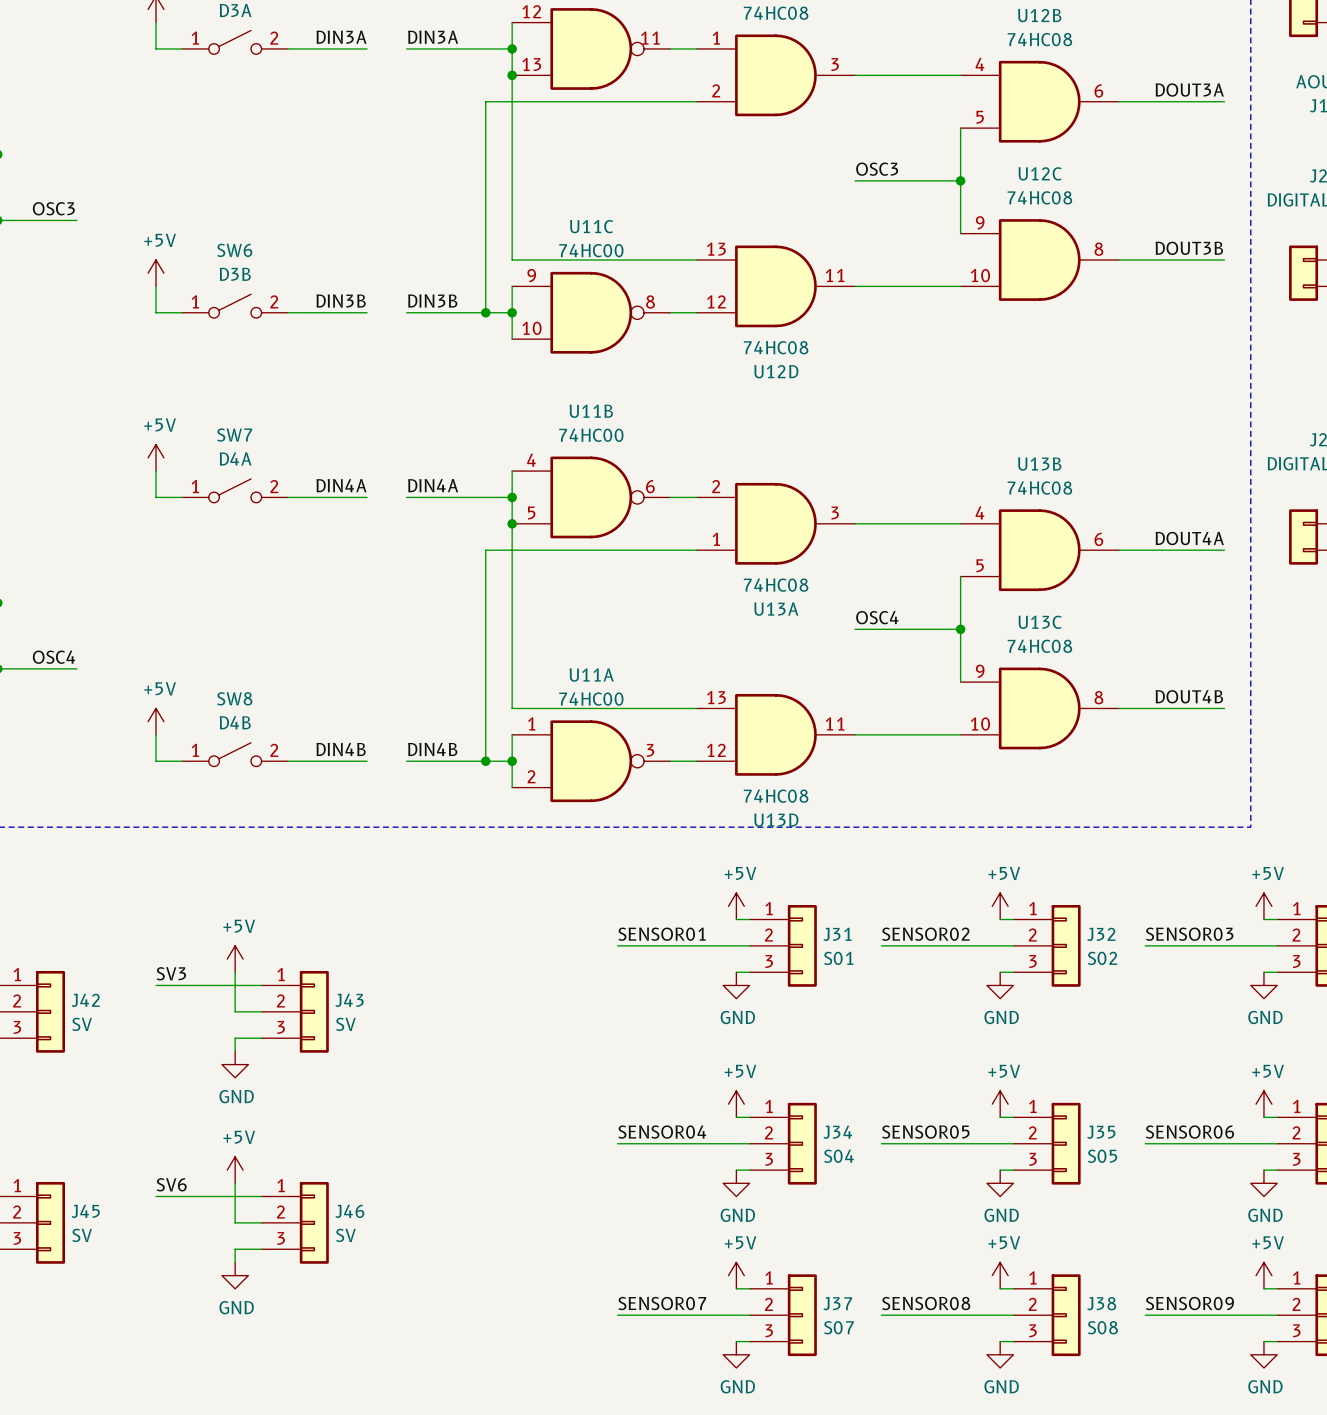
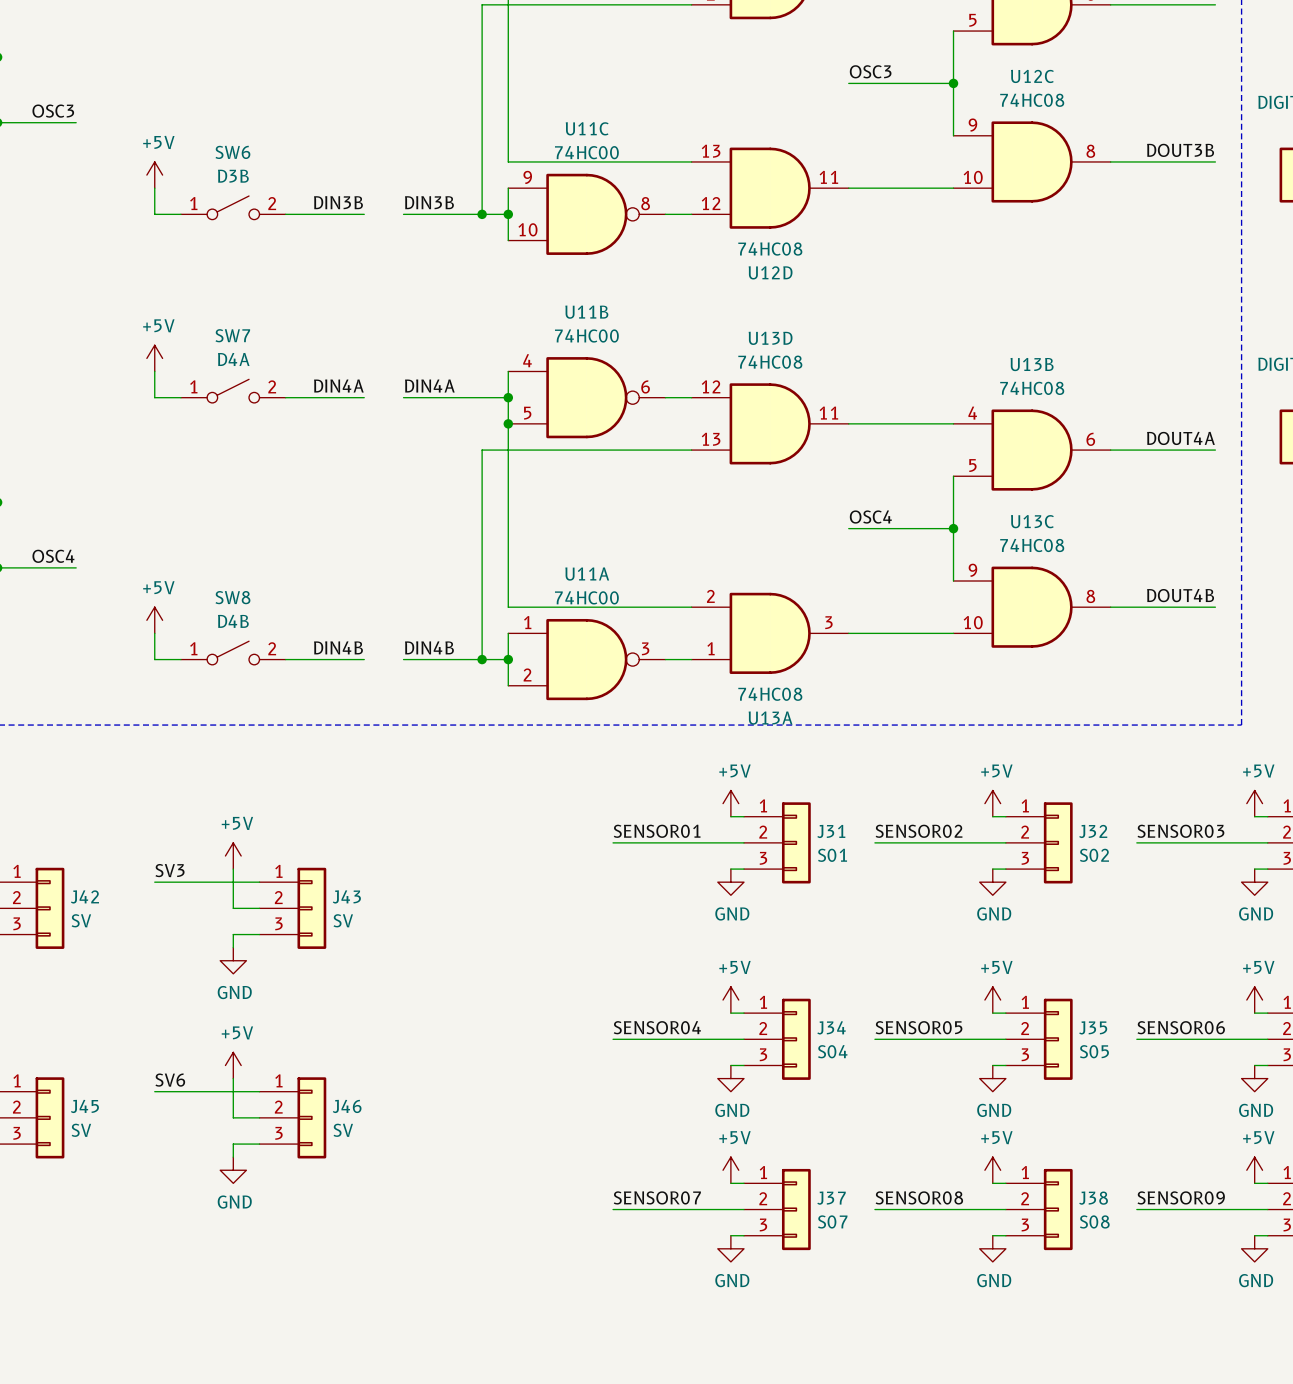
U13A position: (775, 523) -> (770, 633)
U13D flip: as is (775, 734) -> up-down (770, 423)
U13D position: (775, 734) -> (770, 423)

